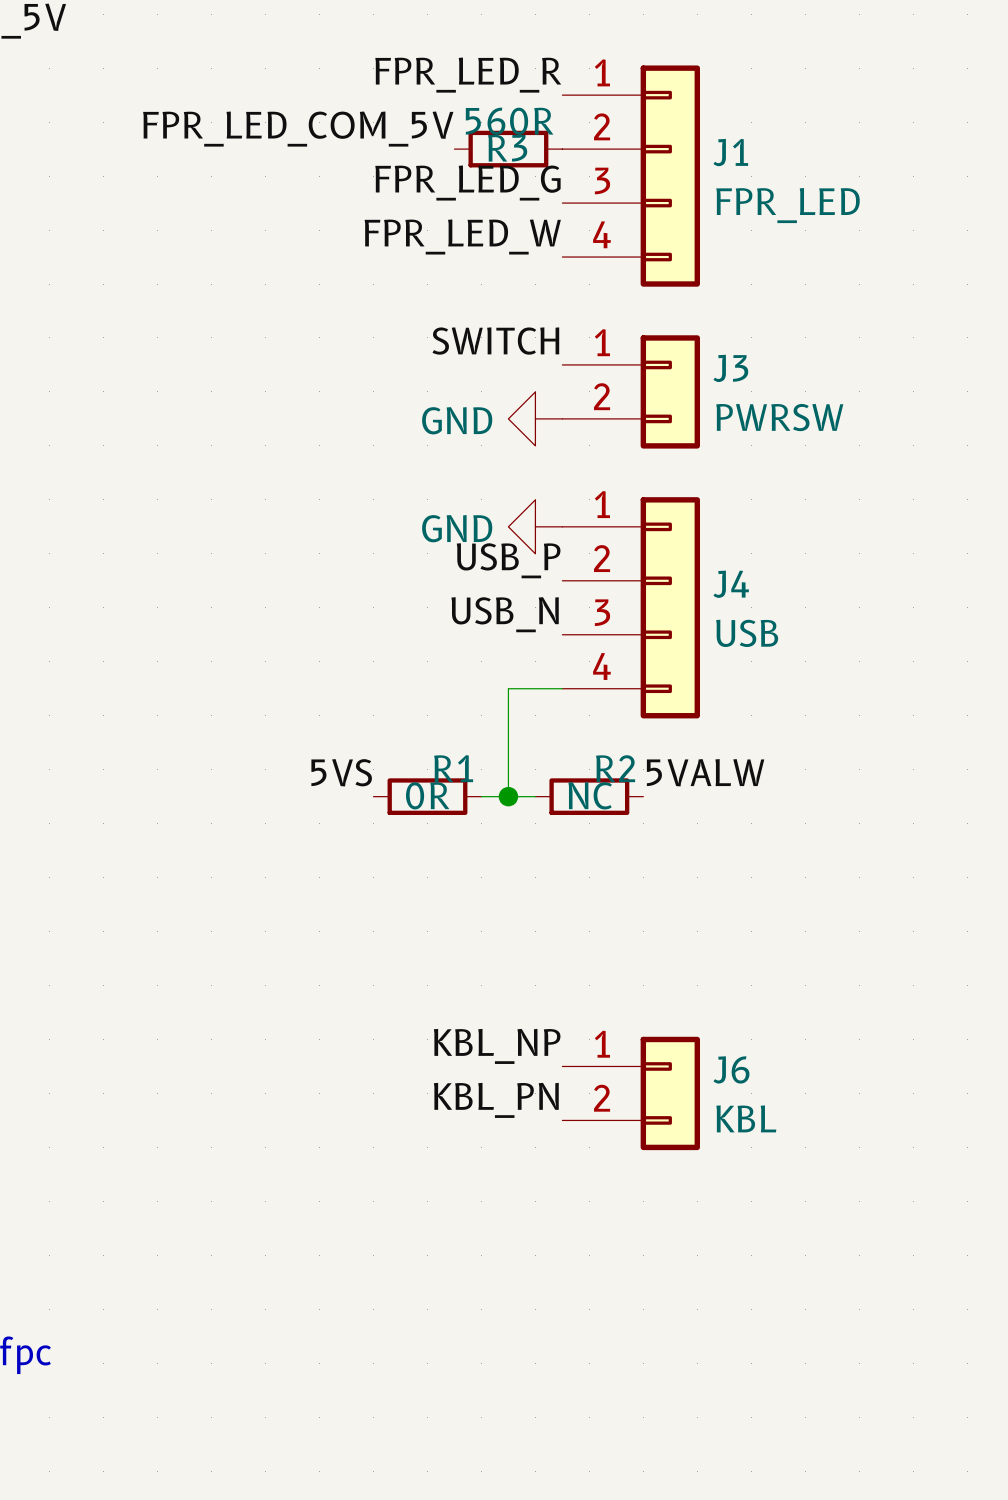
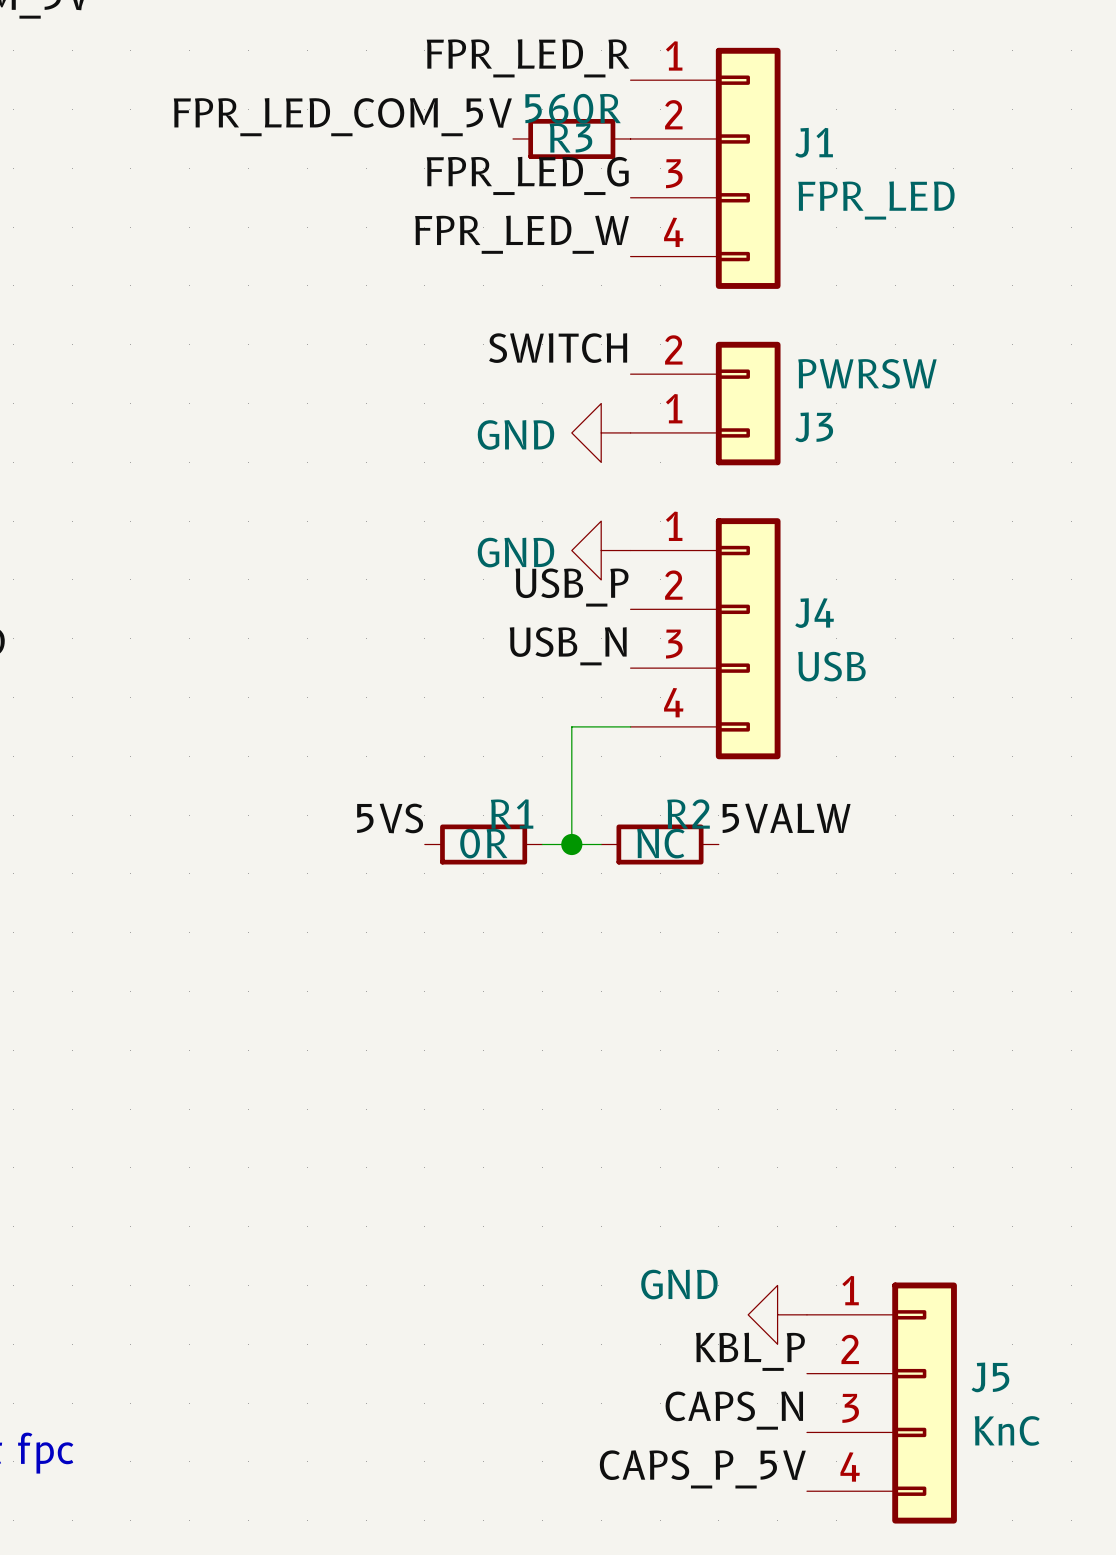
J3 flip: as is (670, 391) -> up-down (748, 403)
label: KBL_NP (497, 1046) -> none
J6: KBL (631, 1093) -> none
label: KBL_PN (496, 1100) -> none
power symbol: none -> GND (777, 1314)
label: none -> KBL_P (750, 1351)
J5: none -> KnC (881, 1403)
label: none -> CAPS_N (734, 1410)
label: none -> CAPS_P_5V (702, 1469)

